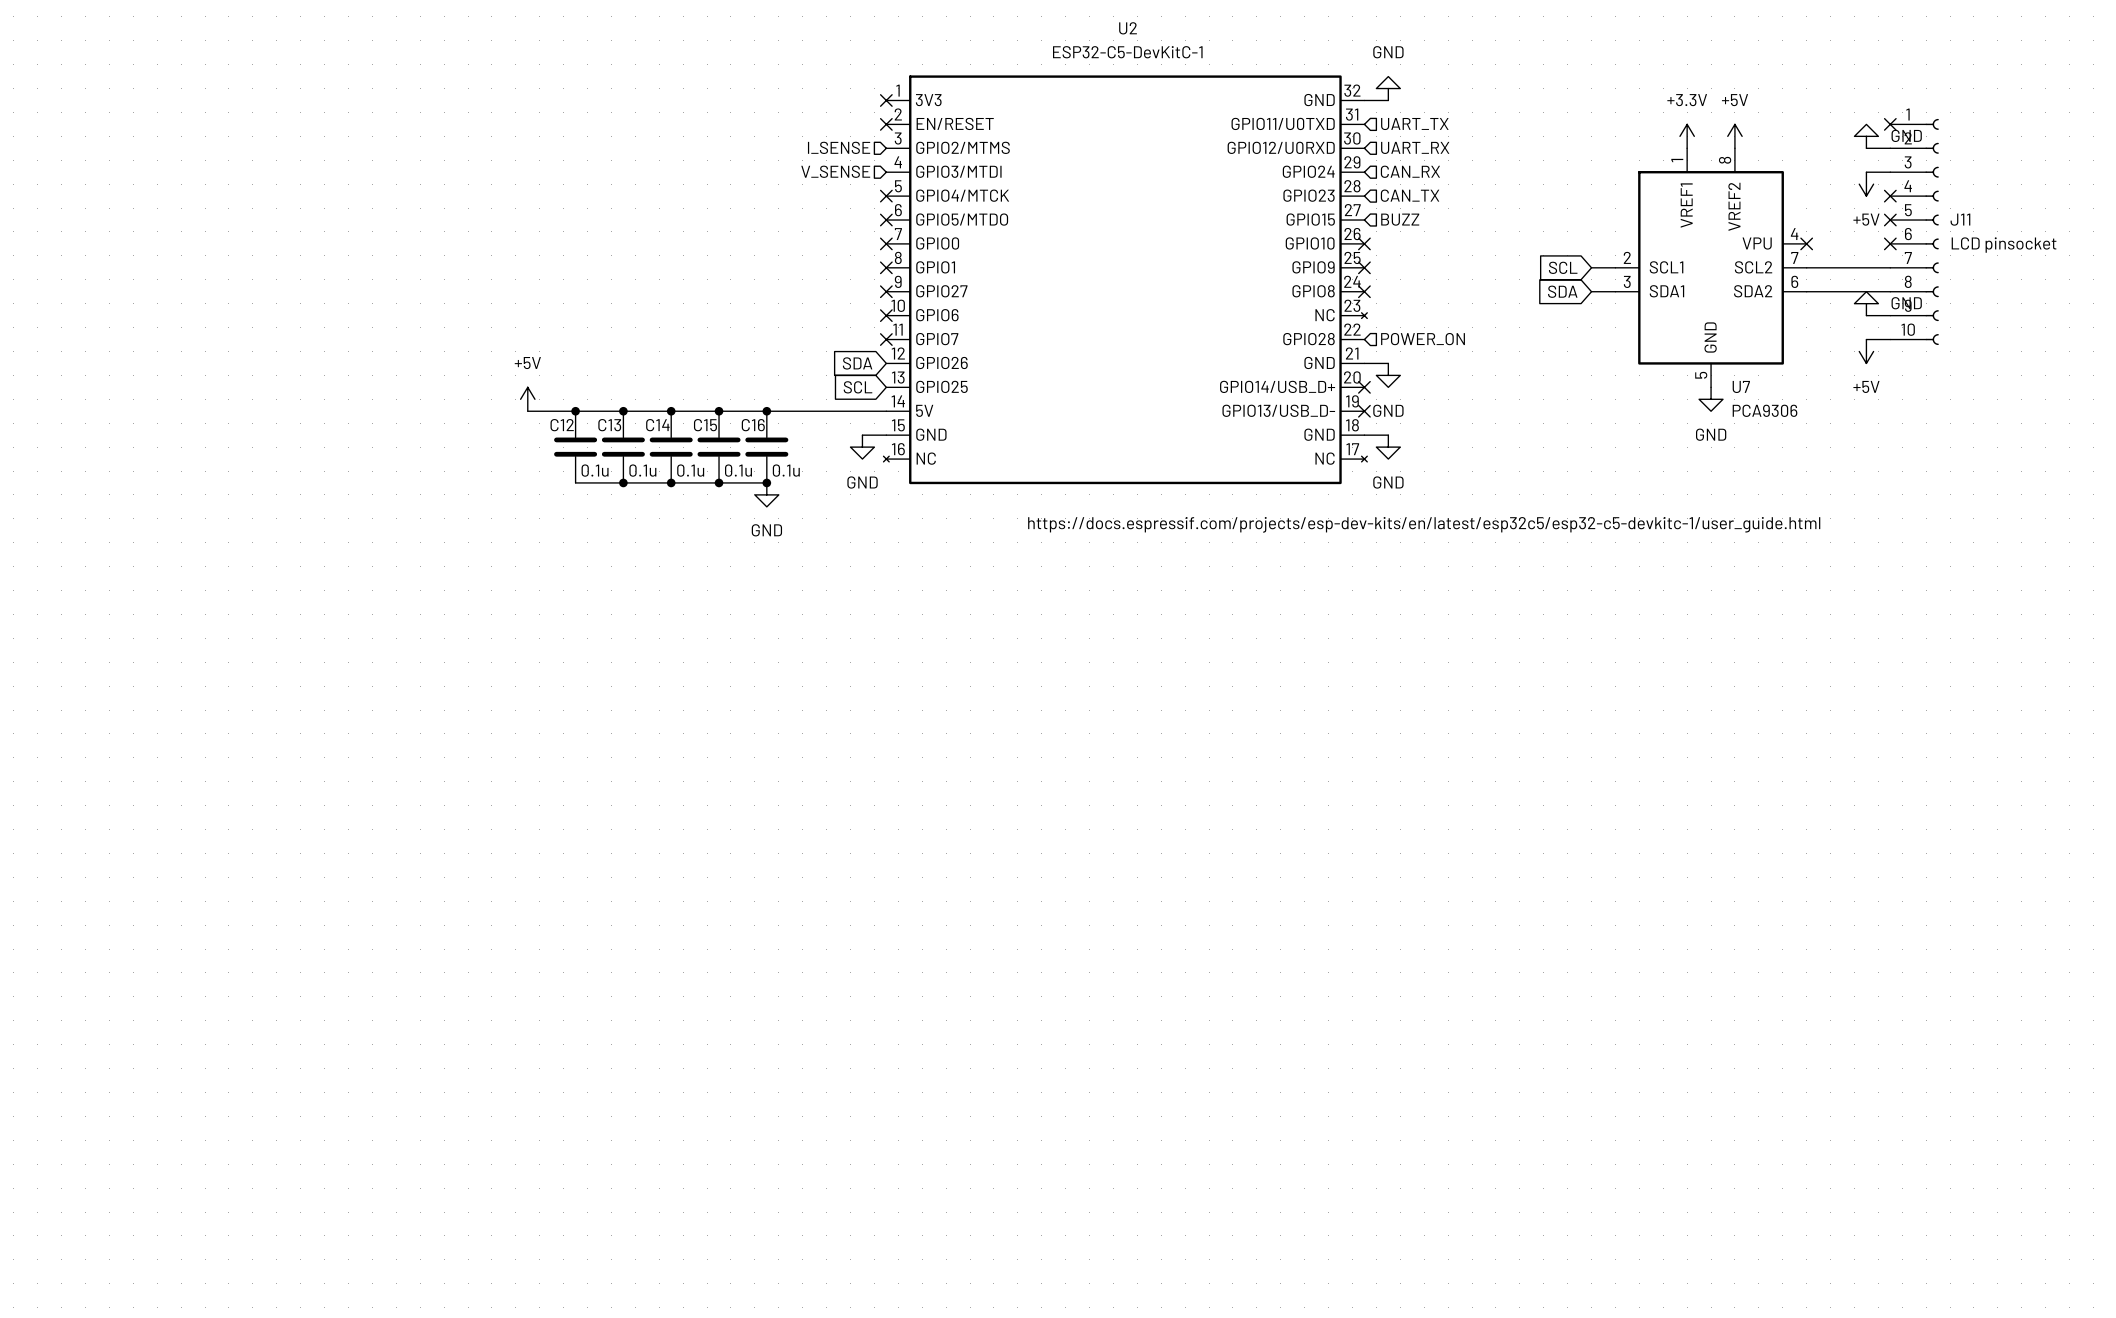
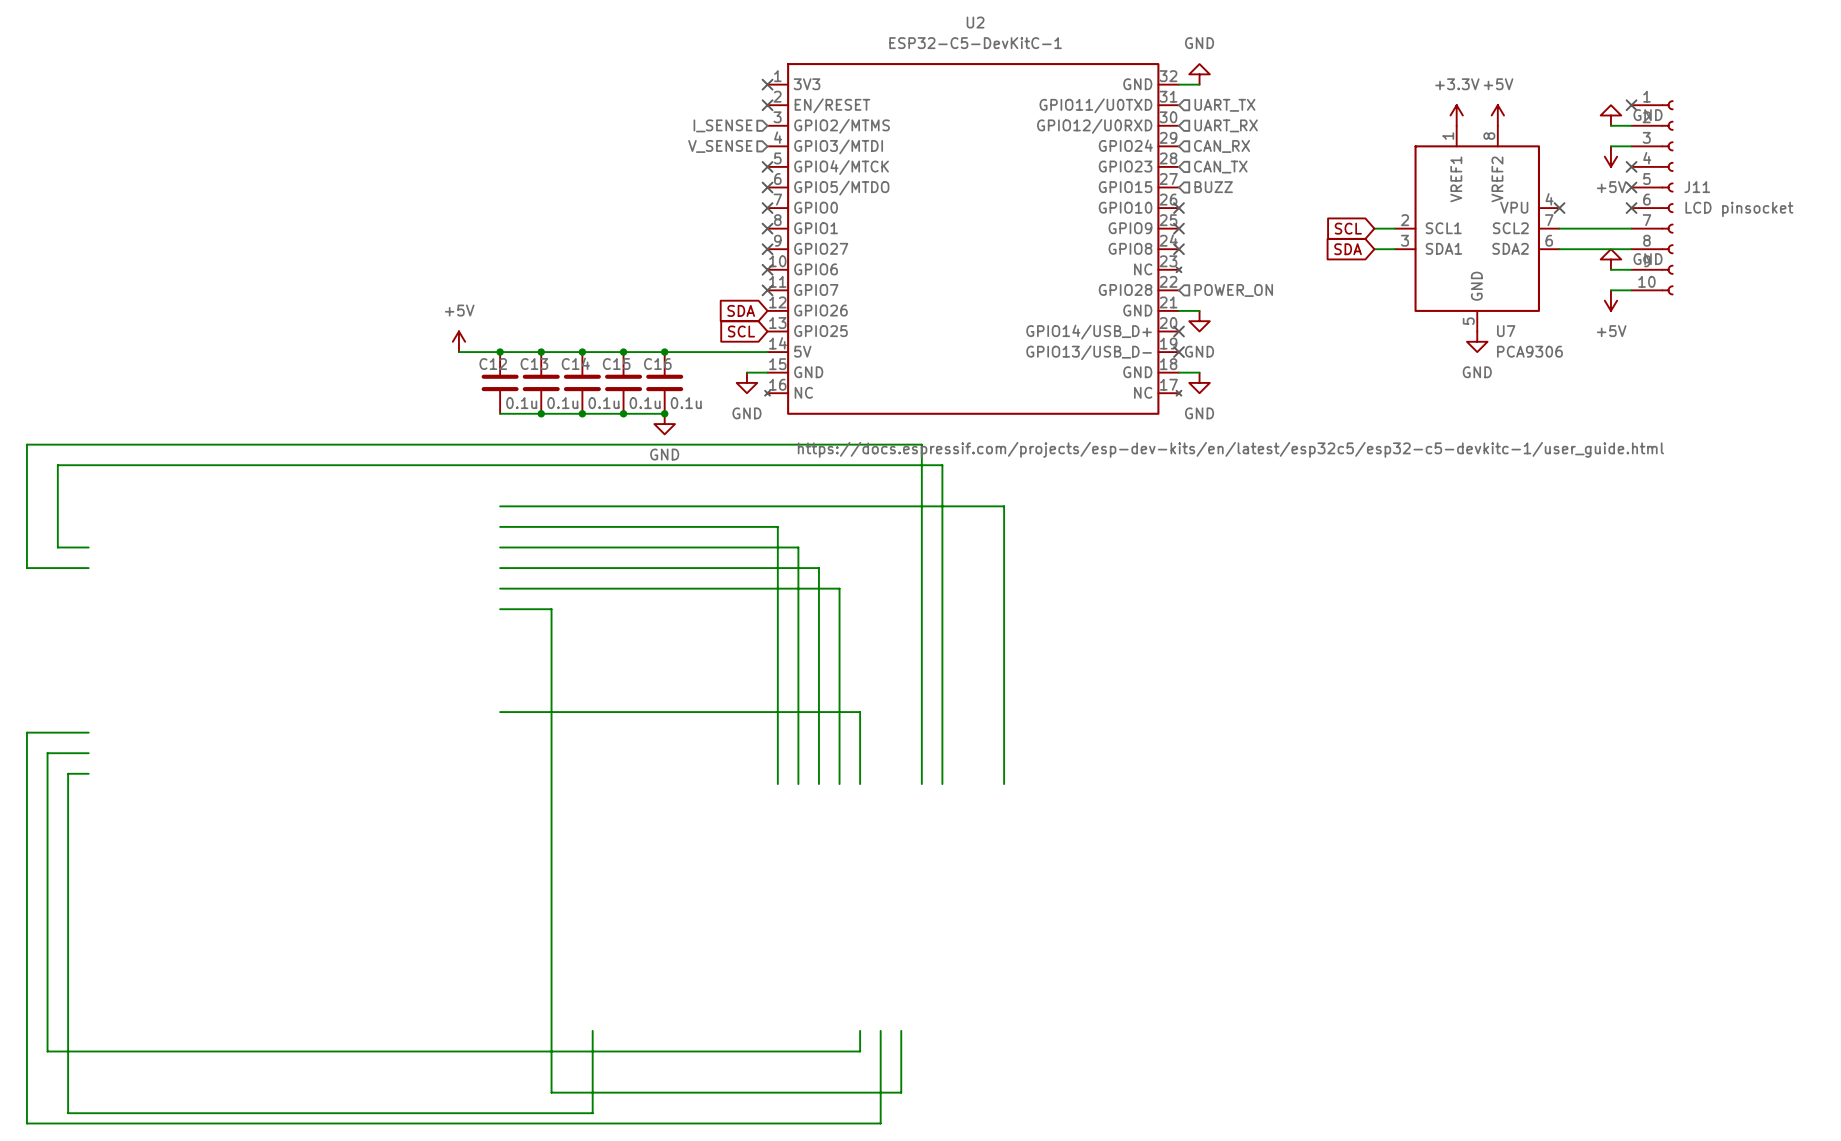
wire: none -> (500, 506) (1004, 506) (1004, 784)
wire: none -> (500, 526) (777, 526) (777, 784)
wire: none -> (88, 547) (57, 547) (57, 465) (942, 465) (942, 784)
wire: none -> (500, 547) (798, 547) (798, 784)
wire: none -> (88, 568) (26, 568) (26, 444) (921, 444) (921, 784)
wire: none -> (500, 568) (818, 568) (818, 784)
wire: none -> (500, 588) (839, 588) (839, 784)
wire: none -> (500, 609) (551, 609) (551, 1092) (901, 1092) (901, 1030)
wire: none -> (500, 712) (860, 712) (860, 784)
wire: none -> (88, 732) (26, 732) (26, 1123) (880, 1123) (880, 1030)
wire: none -> (88, 753) (47, 753) (47, 1051) (860, 1051) (860, 1030)
wire: none -> (88, 773) (68, 773) (68, 1113) (592, 1113) (592, 1030)

